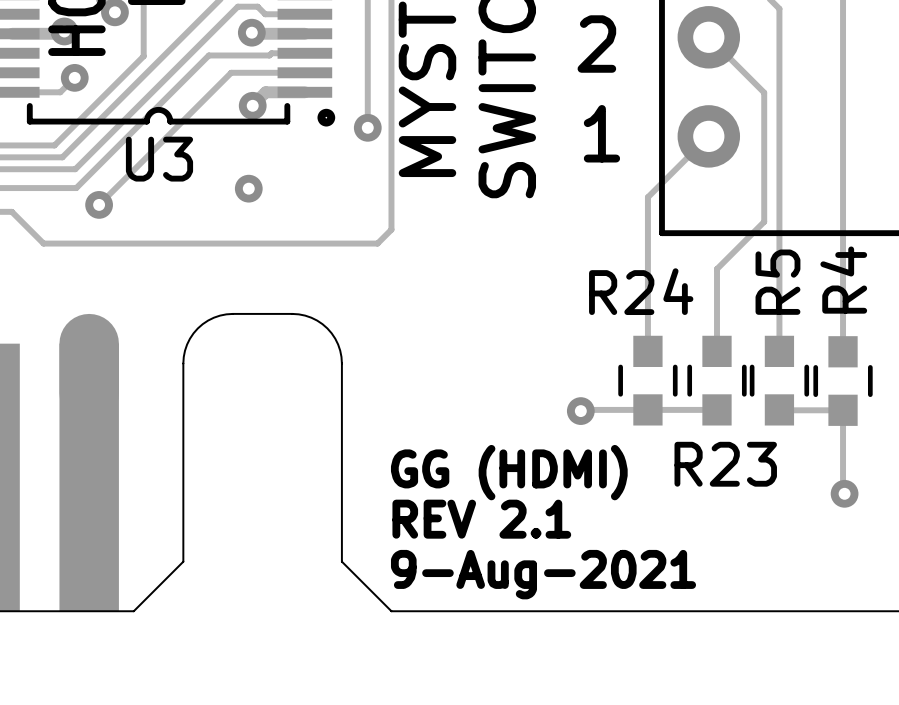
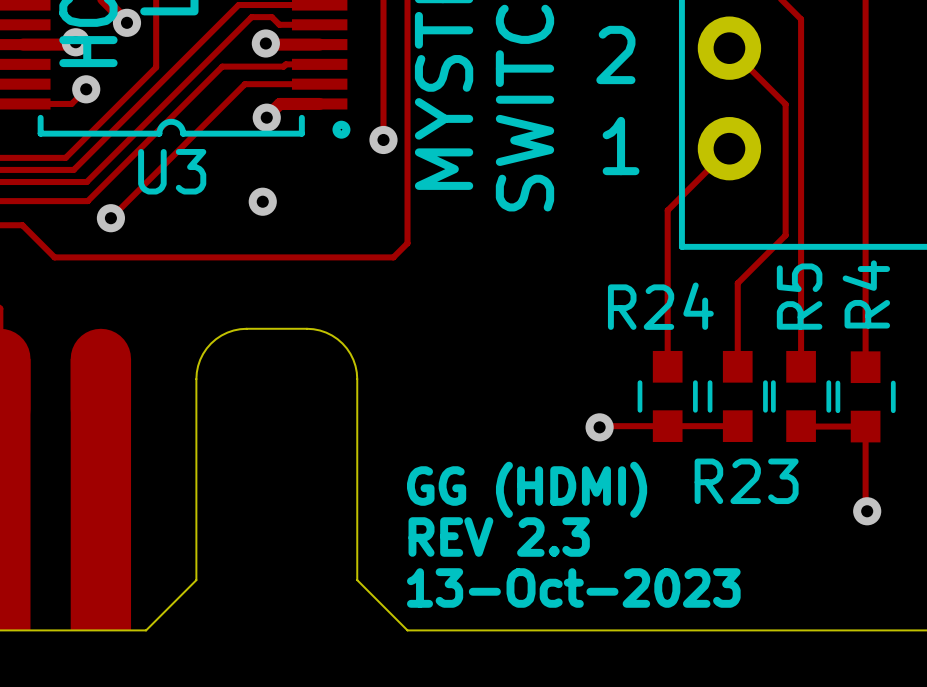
text: REV 2.1 (481, 519) -> REV 2.3 (499, 537)
text: 9-Aug-2021 (543, 574) -> 13-Oct-2023 (573, 587)

